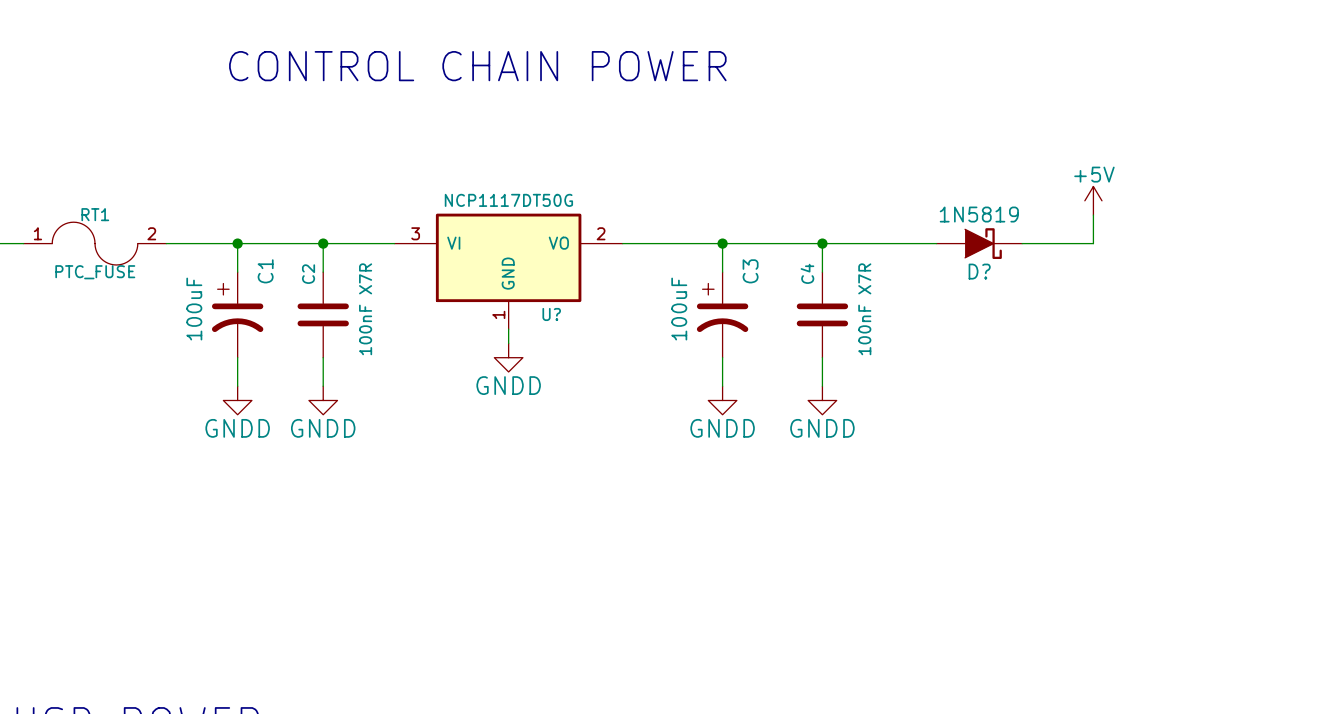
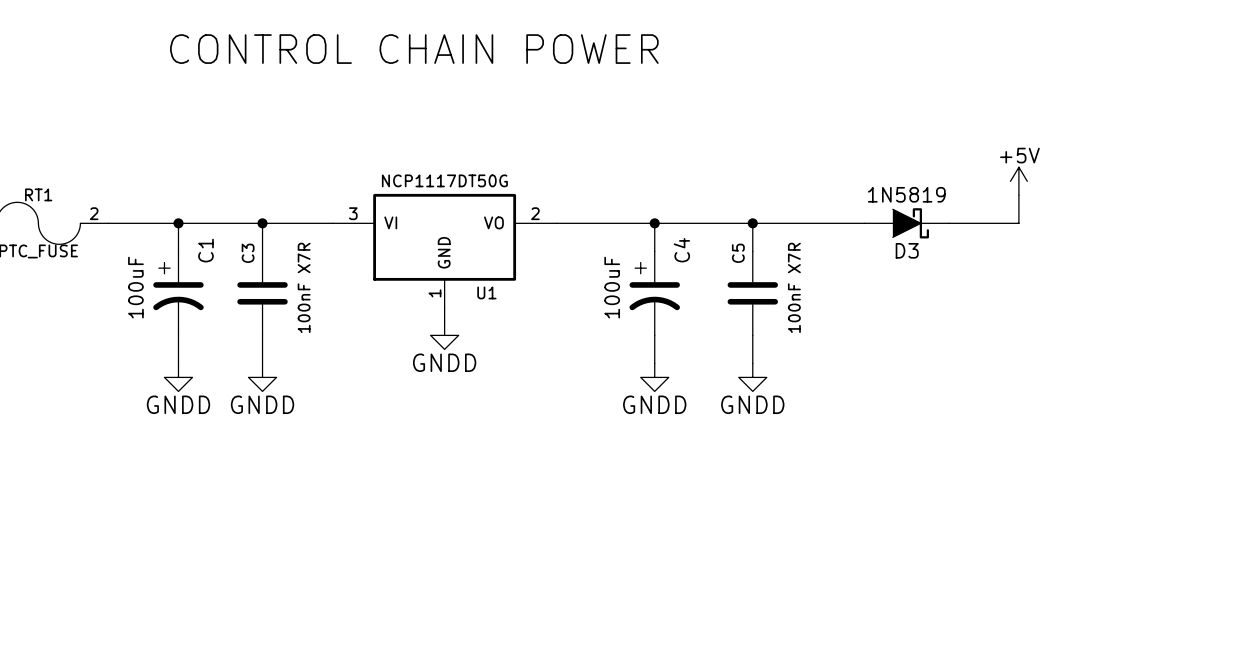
C3 name: C3 (750, 271) -> C4 (681, 250)
D? name: D? (979, 271) -> D3 (907, 250)
C4 name: C4 (807, 273) -> C5 (738, 253)
C2 name: C2 (308, 274) -> C3 (248, 253)
U? name: U? (551, 314) -> U1 (486, 292)

